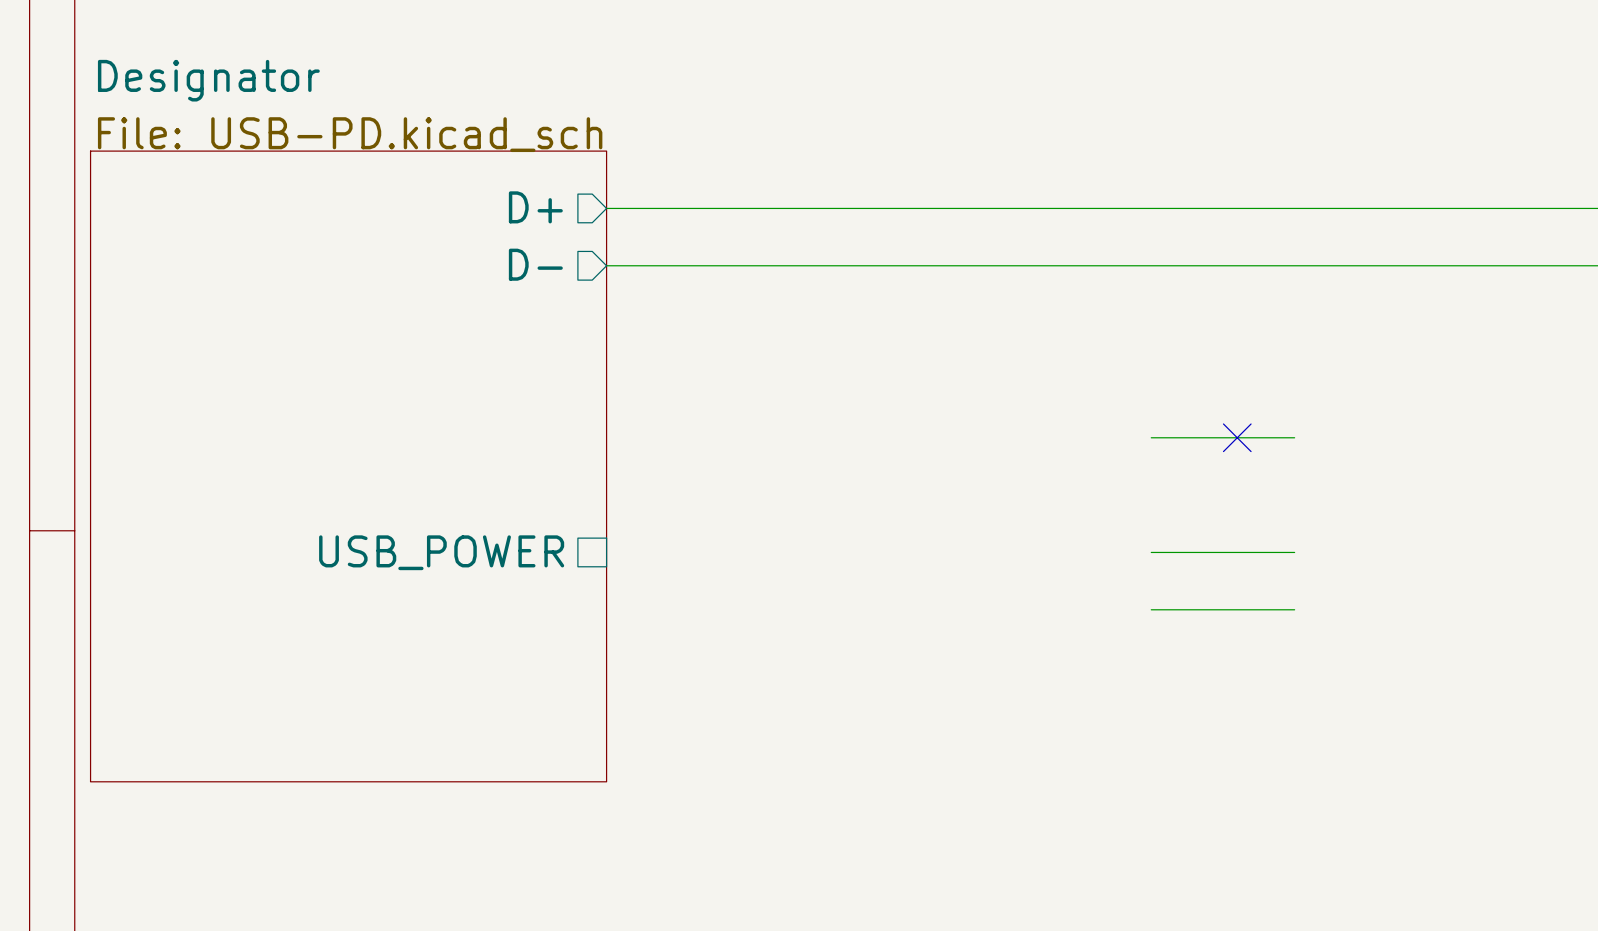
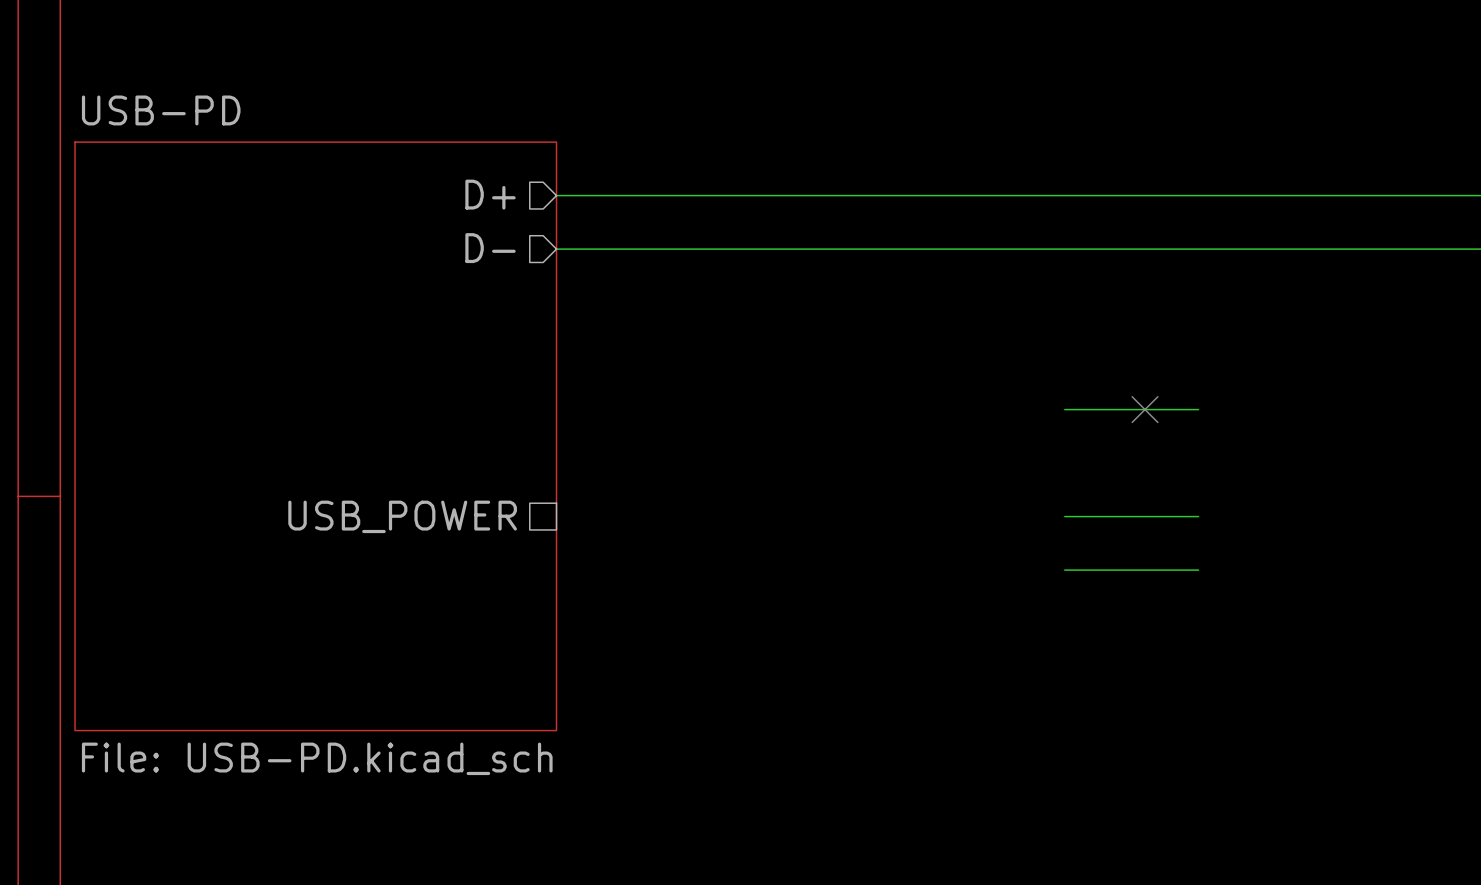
sheet Designator name: Designator (208, 80) -> USB-PD (161, 110)
sheet Designator value position: File: USB-PD.kicad_sch (350, 134) -> File: USB-PD.kicad_sch (317, 758)

